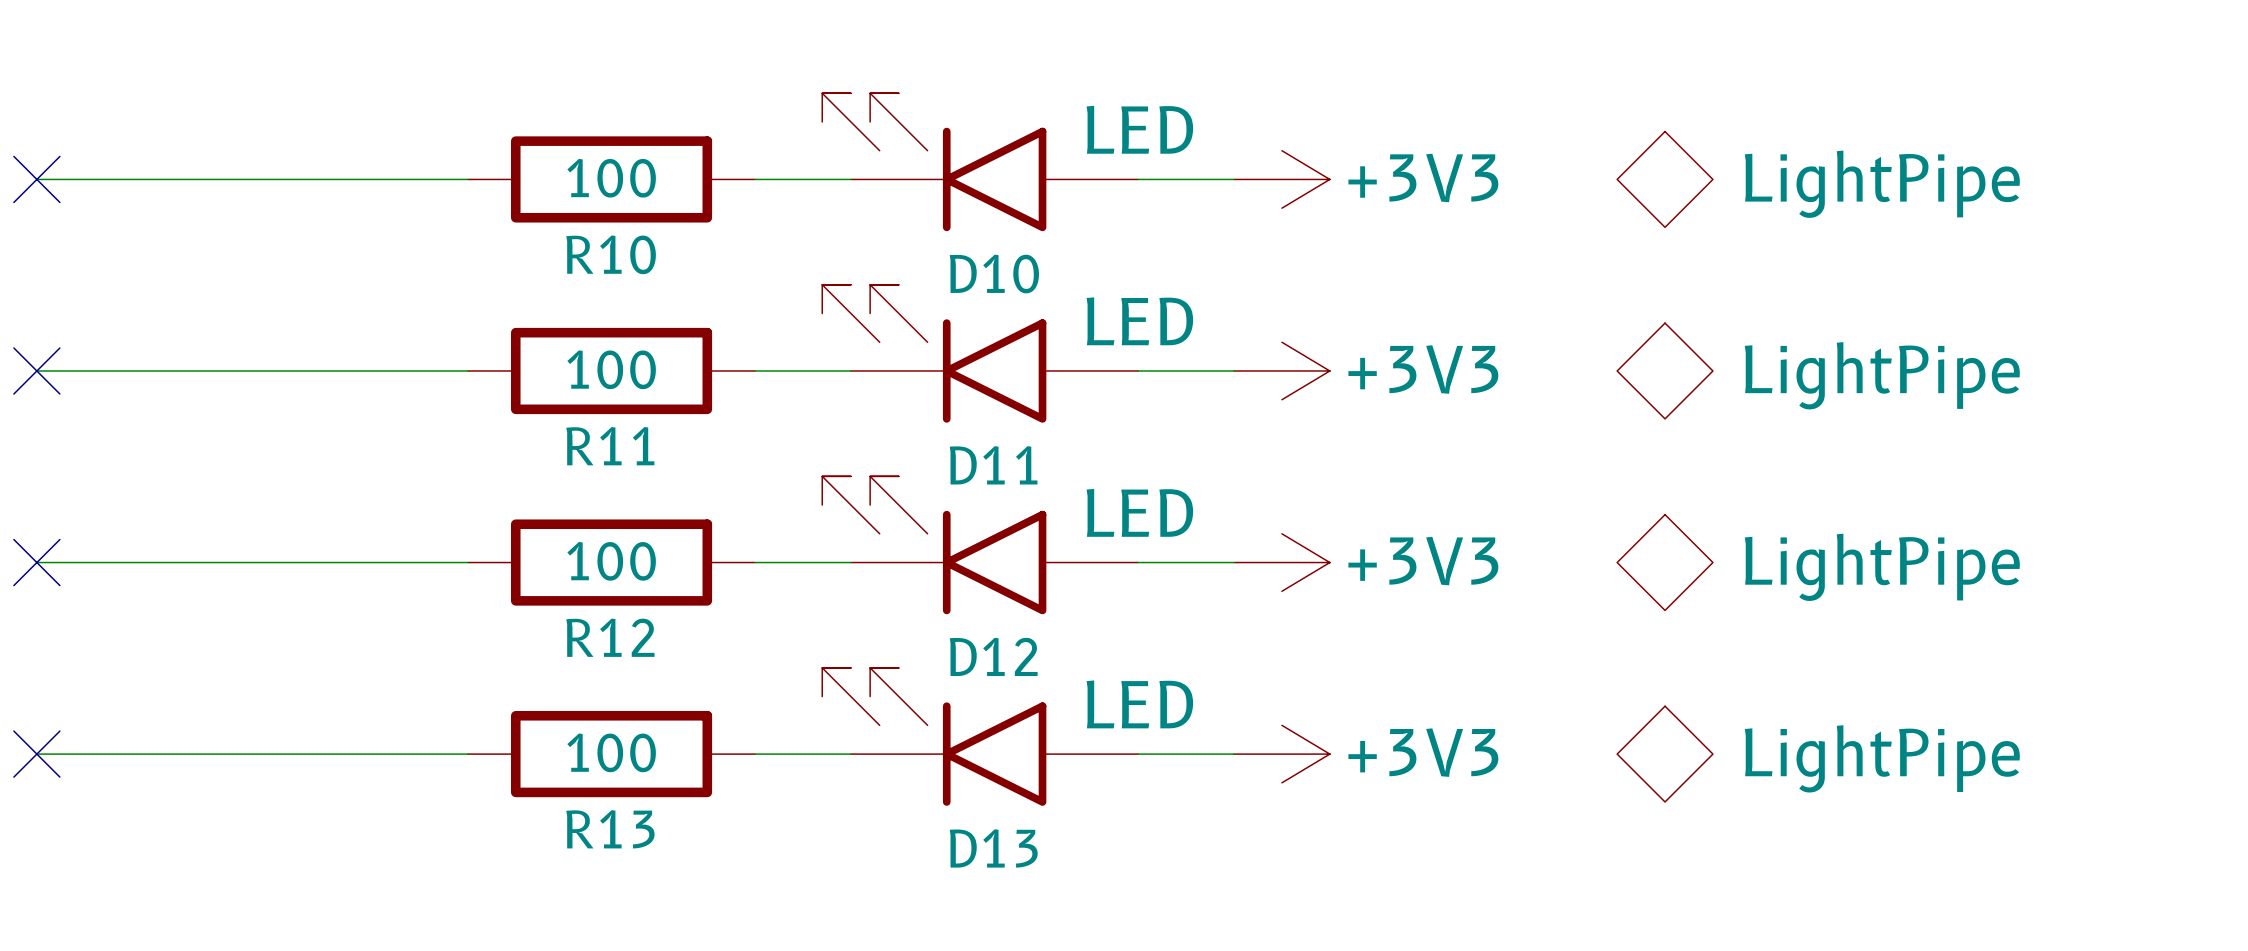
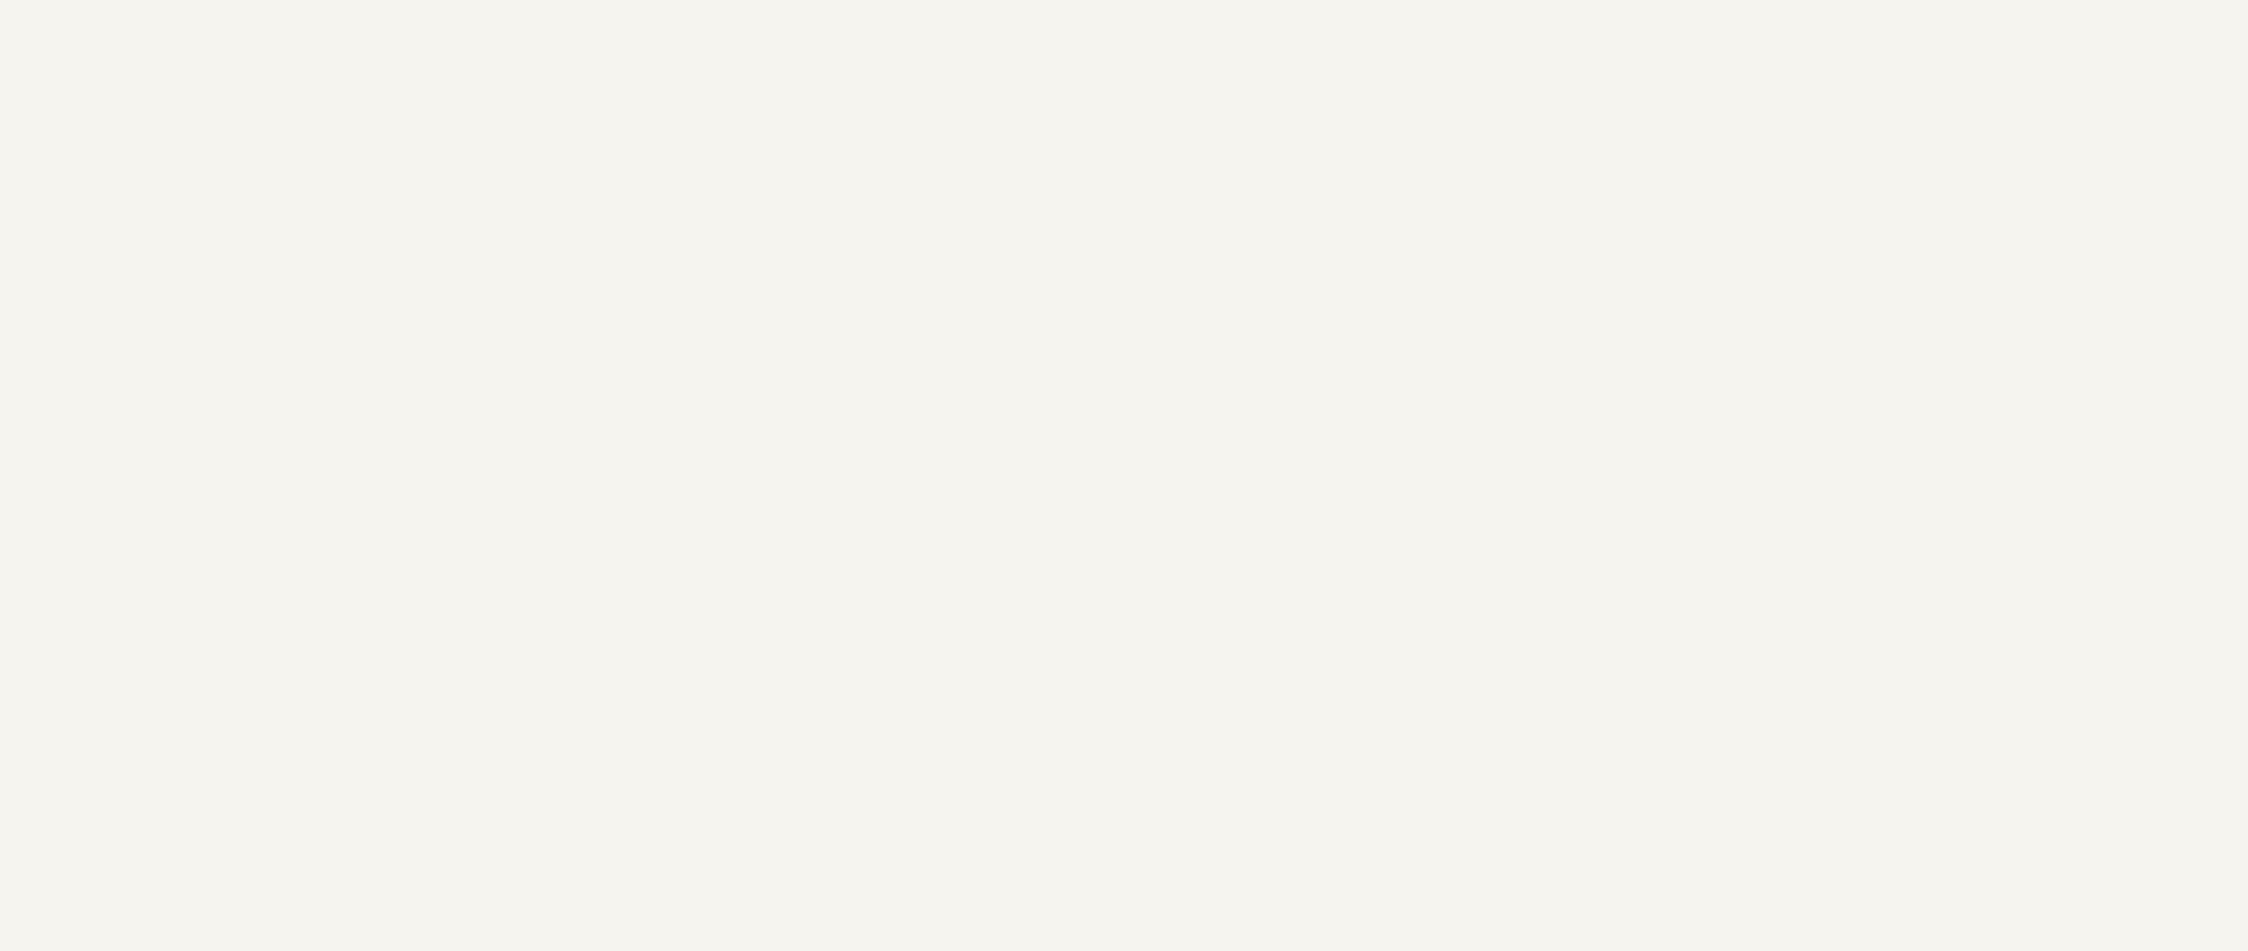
D10: LED (980, 162) -> none
wire: (36, 179) (467, 179) -> none
no-connect mark: (36, 179) -> none
R10: 100 (611, 179) -> none
wire: (755, 179) (850, 179) -> none
wire: (1138, 179) (1234, 179) -> none
power symbol: +3V3 (1281, 179) -> none
part: LightPipe (1665, 179) -> none
D11: LED (980, 353) -> none
wire: (36, 370) (467, 370) -> none
no-connect mark: (36, 370) -> none
R11: 100 (611, 370) -> none
wire: (755, 370) (850, 370) -> none
wire: (1138, 370) (1234, 370) -> none
power symbol: +3V3 (1281, 370) -> none
part: LightPipe (1665, 370) -> none
D12: LED (980, 545) -> none
wire: (36, 562) (467, 562) -> none
no-connect mark: (36, 562) -> none
R12: 100 (611, 562) -> none
wire: (755, 562) (850, 562) -> none
wire: (1138, 562) (1234, 562) -> none
power symbol: +3V3 (1281, 562) -> none
part: LightPipe (1665, 562) -> none
D13: LED (980, 736) -> none
wire: (36, 754) (467, 754) -> none
no-connect mark: (36, 754) -> none
R13: 100 (611, 754) -> none
wire: (755, 754) (850, 754) -> none
wire: (1138, 754) (1234, 754) -> none
power symbol: +3V3 (1281, 754) -> none
part: LightPipe (1665, 754) -> none

